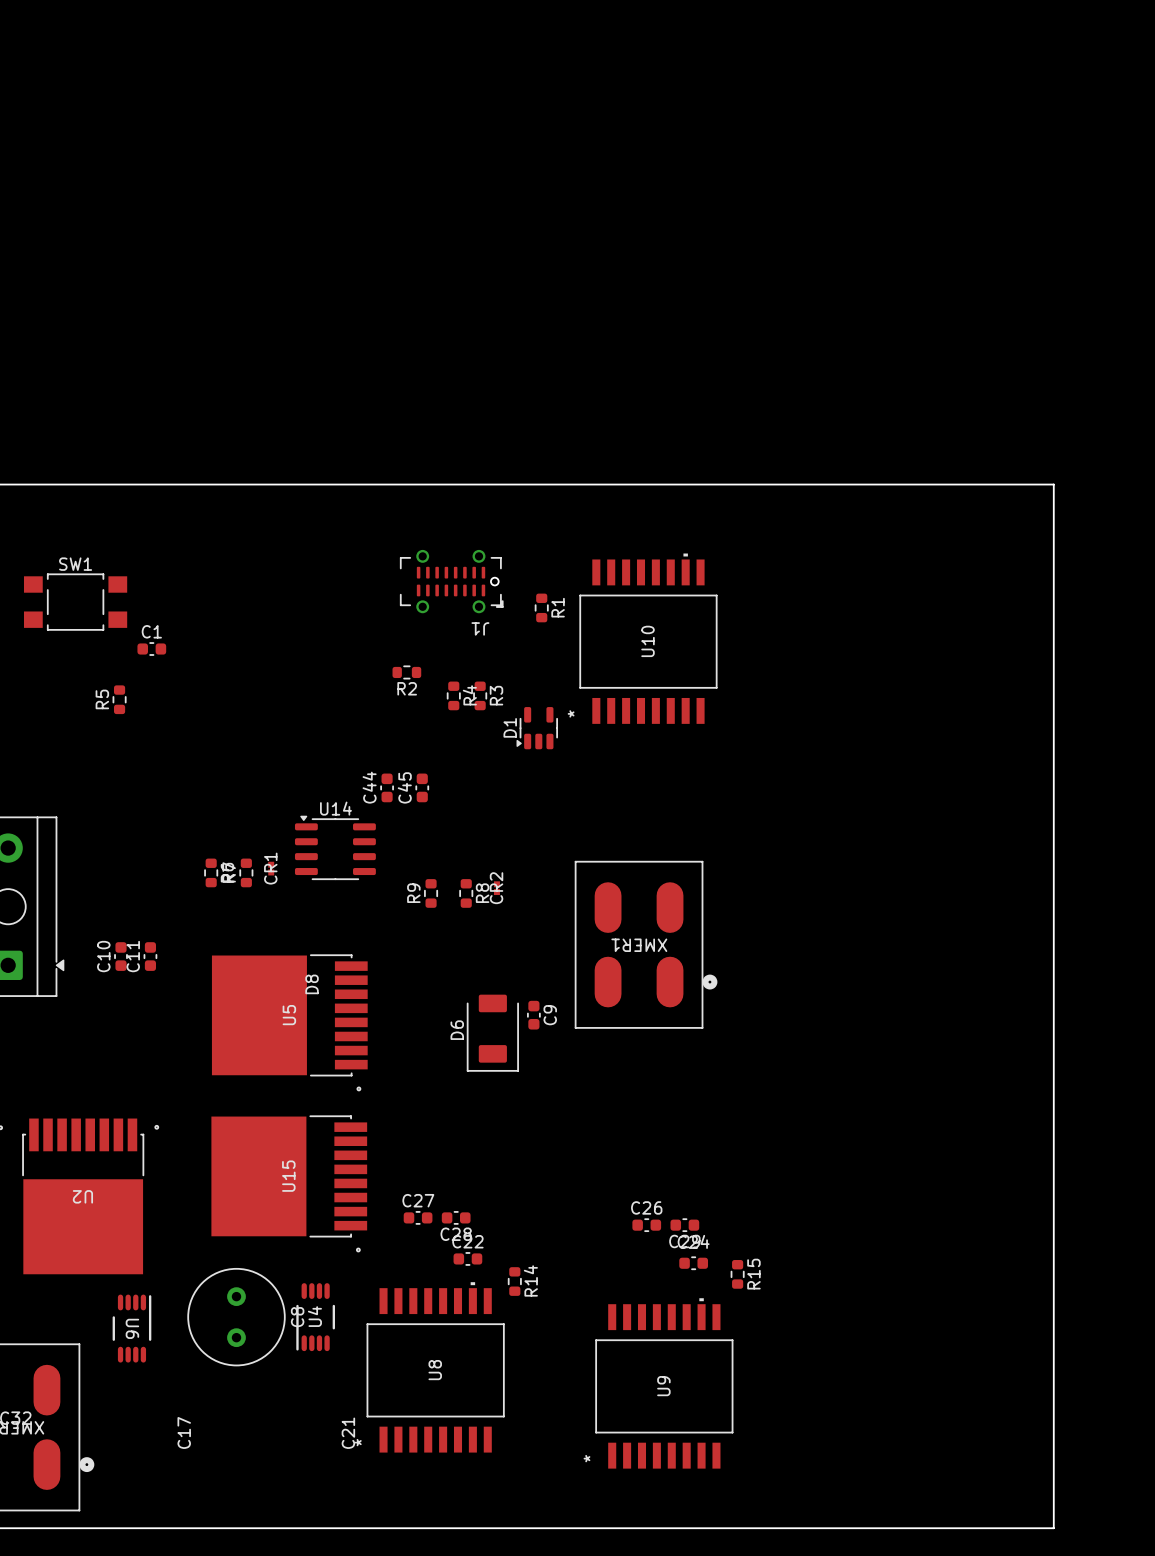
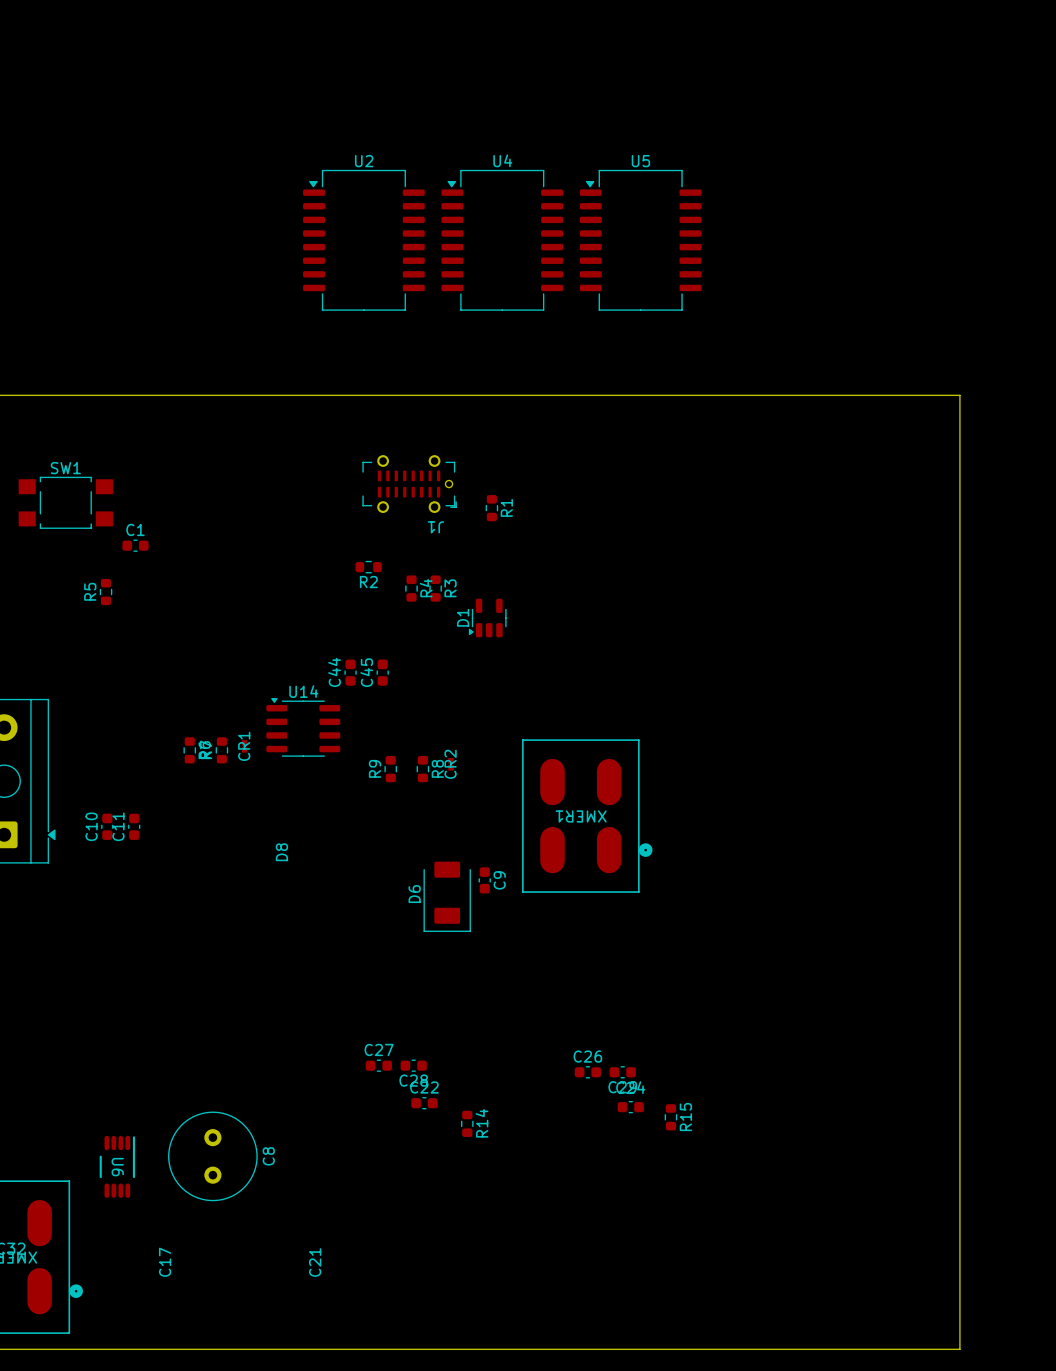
U10: (648, 638) -> none
U5 footprint: [211, 954, 368, 1092] -> [579, 169, 702, 311]
U5 name position: U5 (289, 1015) -> U5 (640, 161)
U2 footprint: [22, 1118, 160, 1275] -> [303, 169, 425, 311]
U15: (289, 1183) -> none
U2 name position: U2 (82, 1196) -> U2 (364, 161)
U4 footprint: [296, 1283, 336, 1352] -> [441, 169, 564, 311]
U4 name position: U4 (314, 1316) -> U4 (502, 160)
U8: (435, 1367) -> none
U9: (664, 1383) -> none

